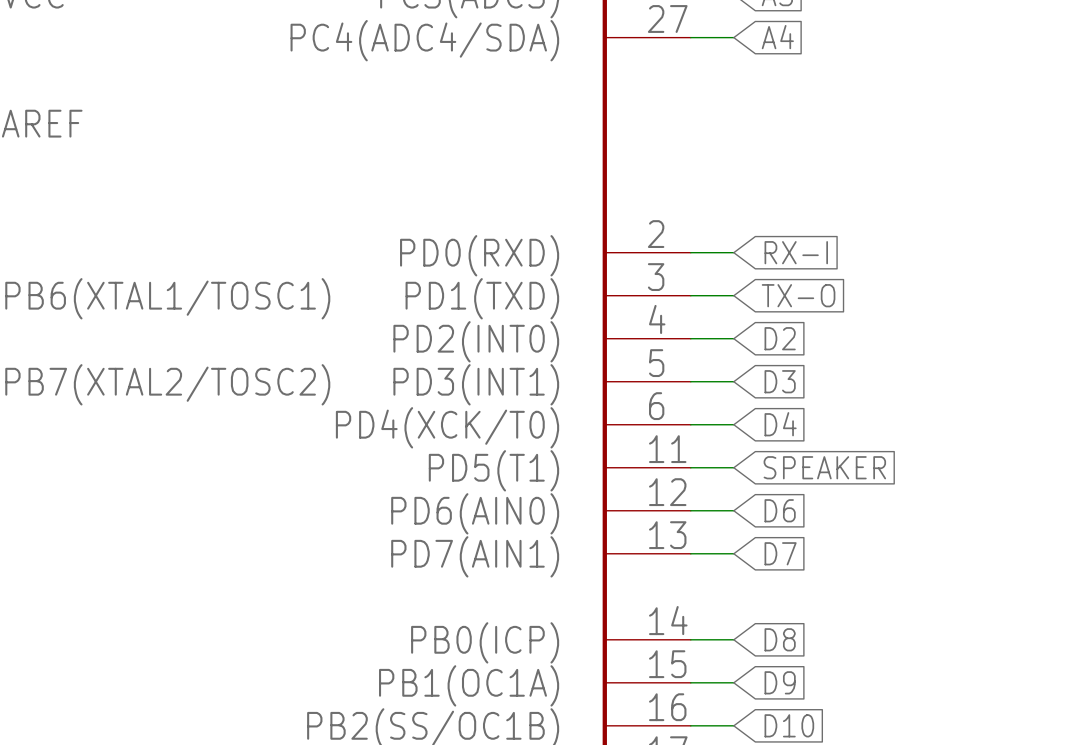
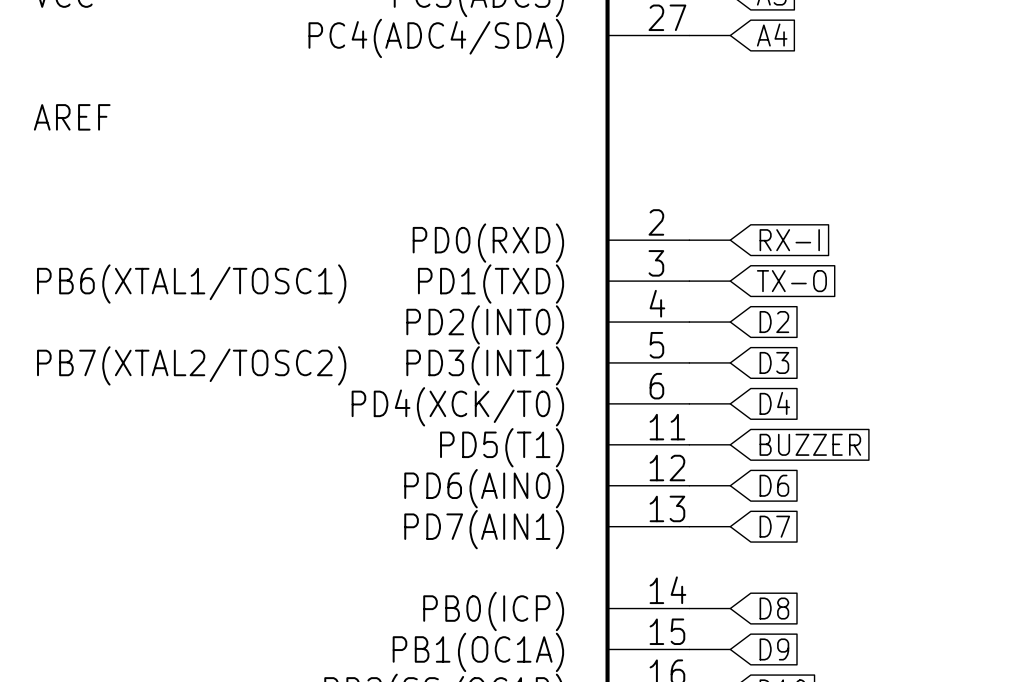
global label: SPEAKER (824, 467) -> BUZZER (810, 444)

